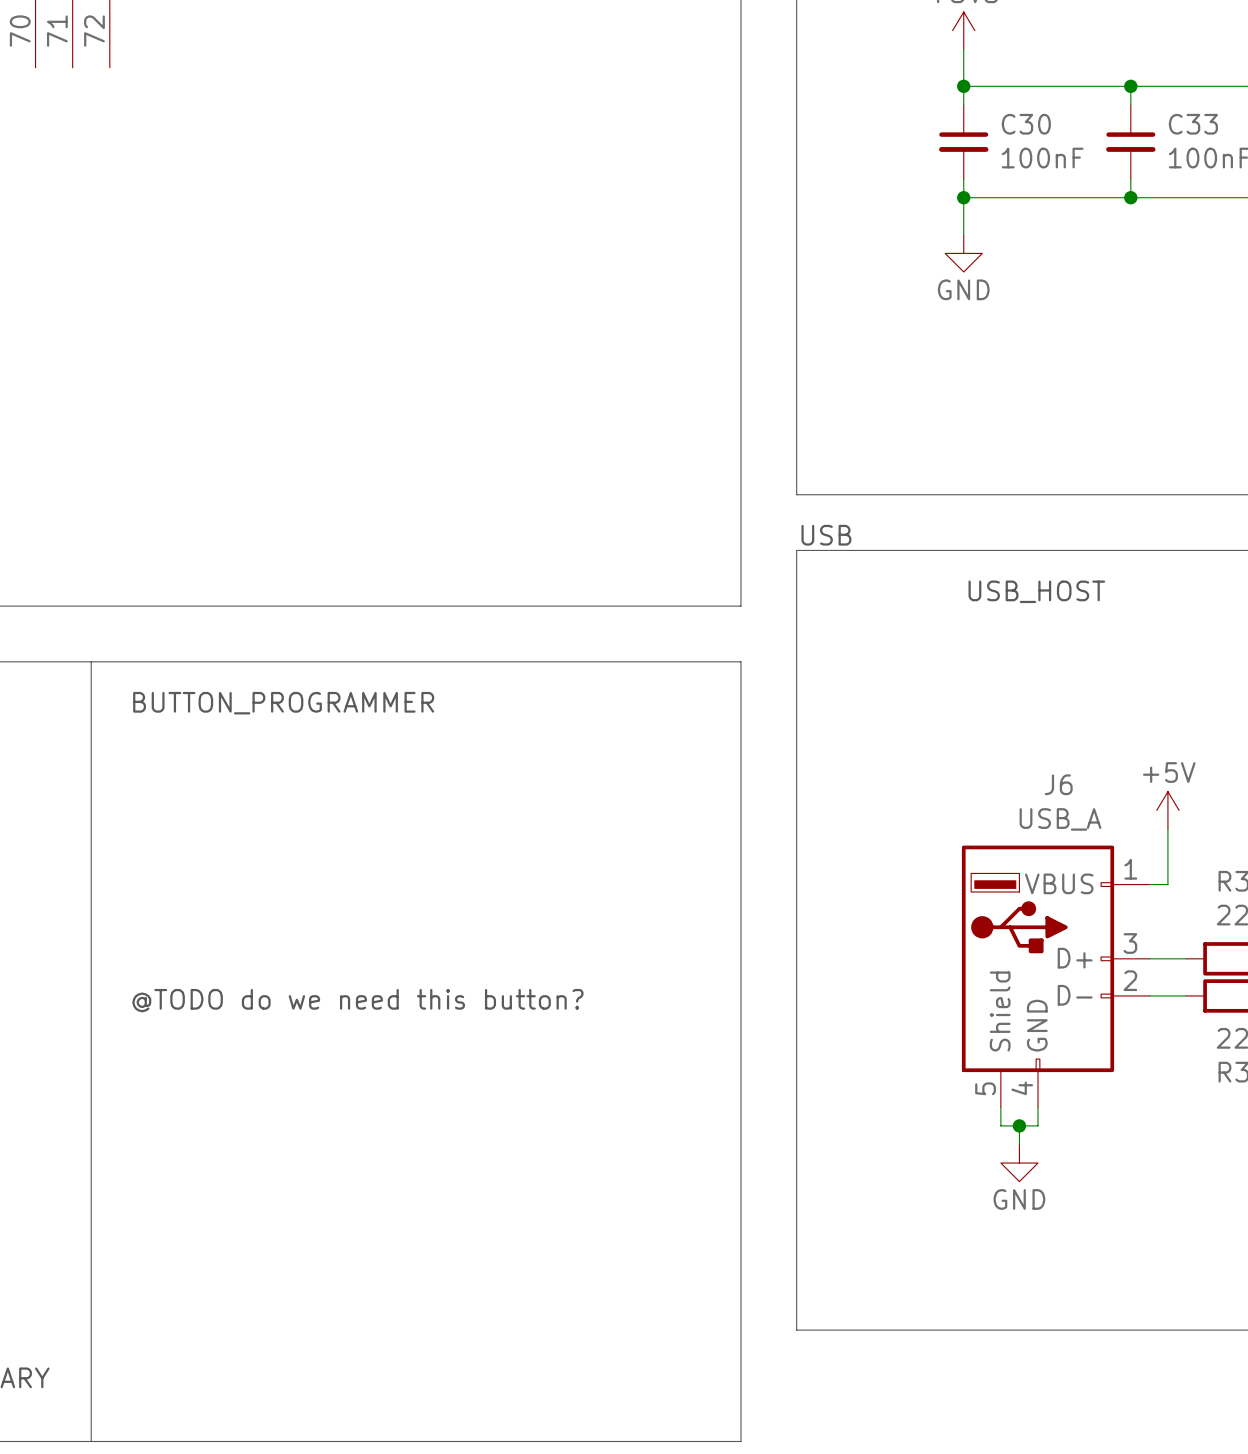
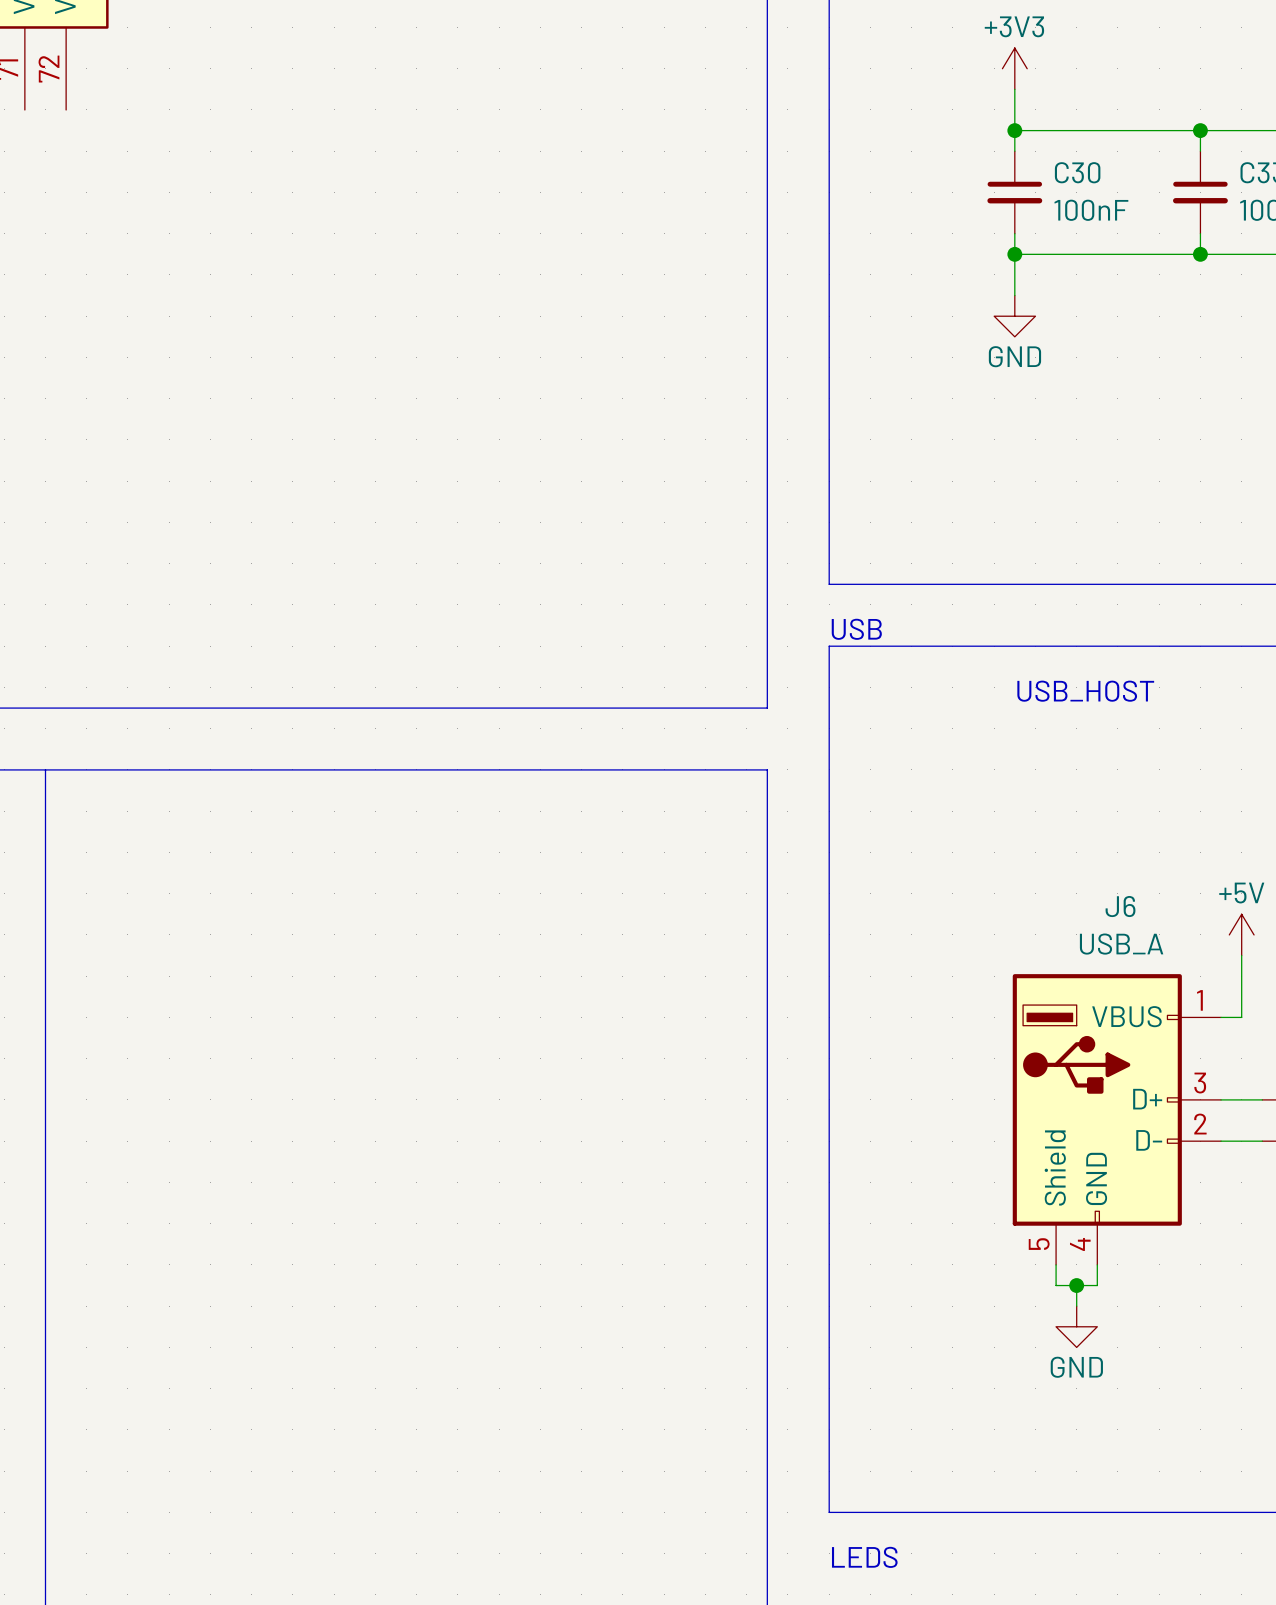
text: BUTTON_PROGRAMMER (283, 703) -> none
text: @TODO do we need this button? (357, 1000) -> none
text: none -> LEDS (864, 1557)

